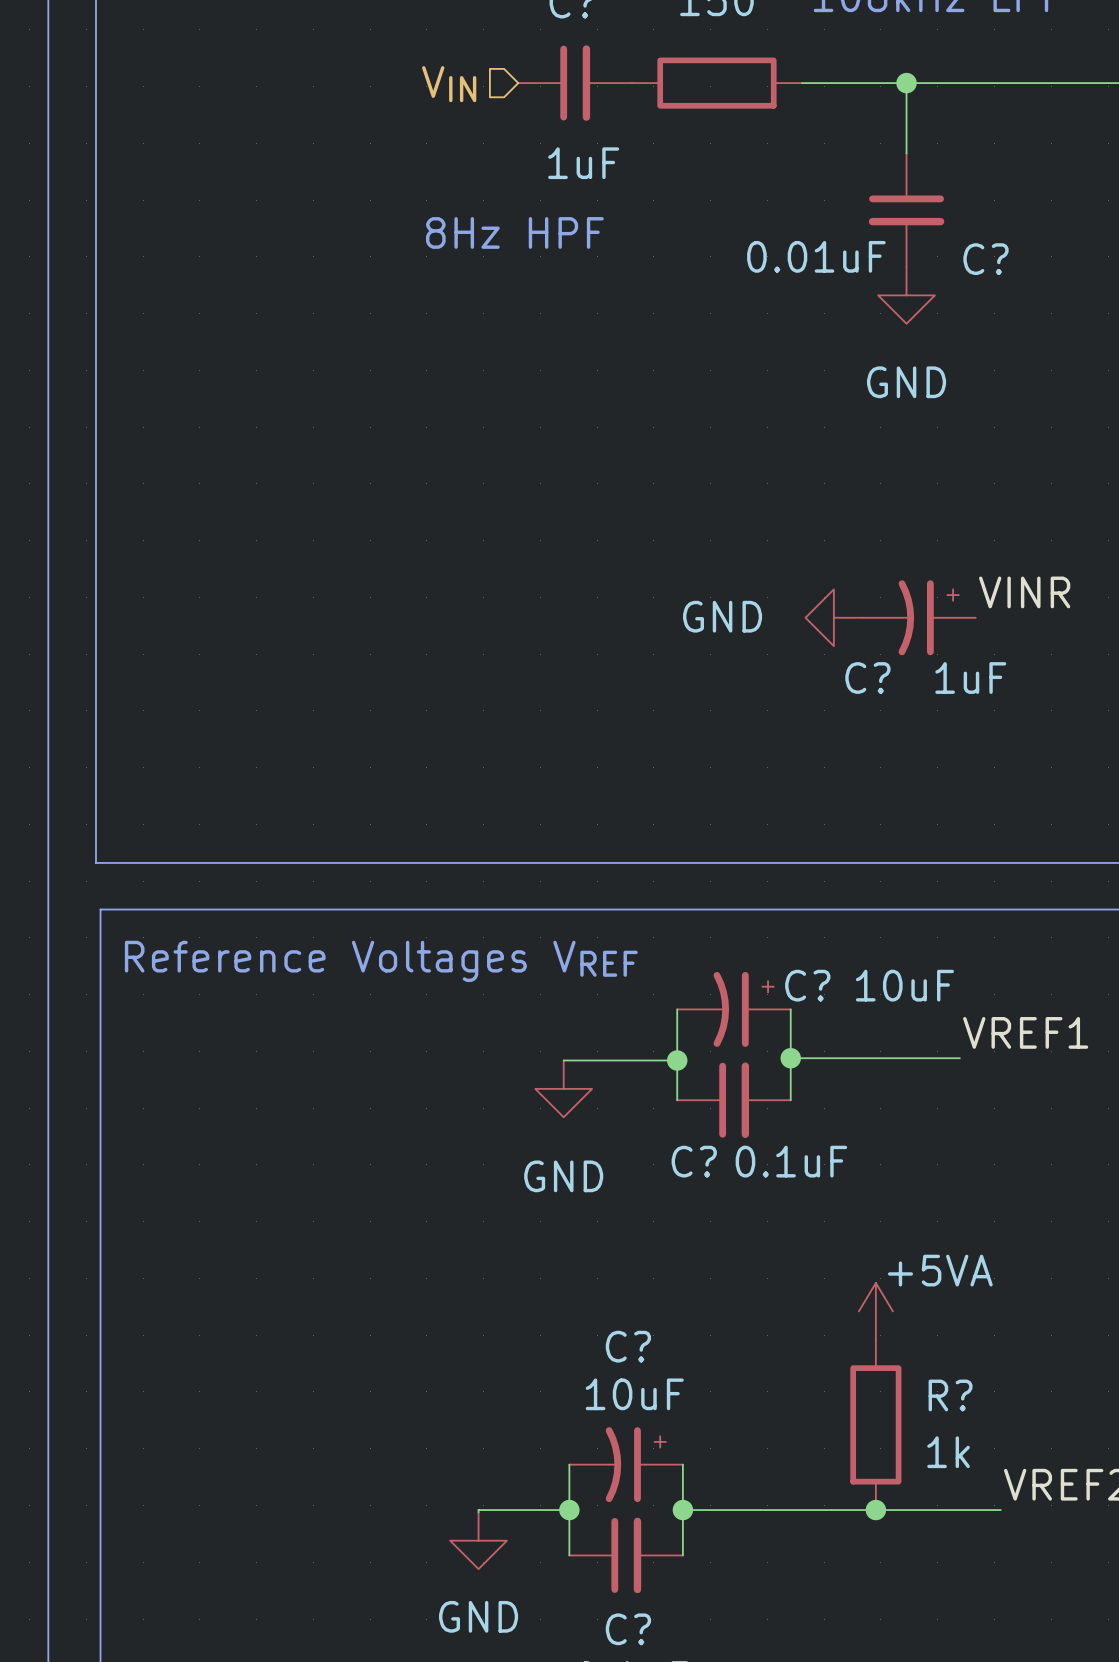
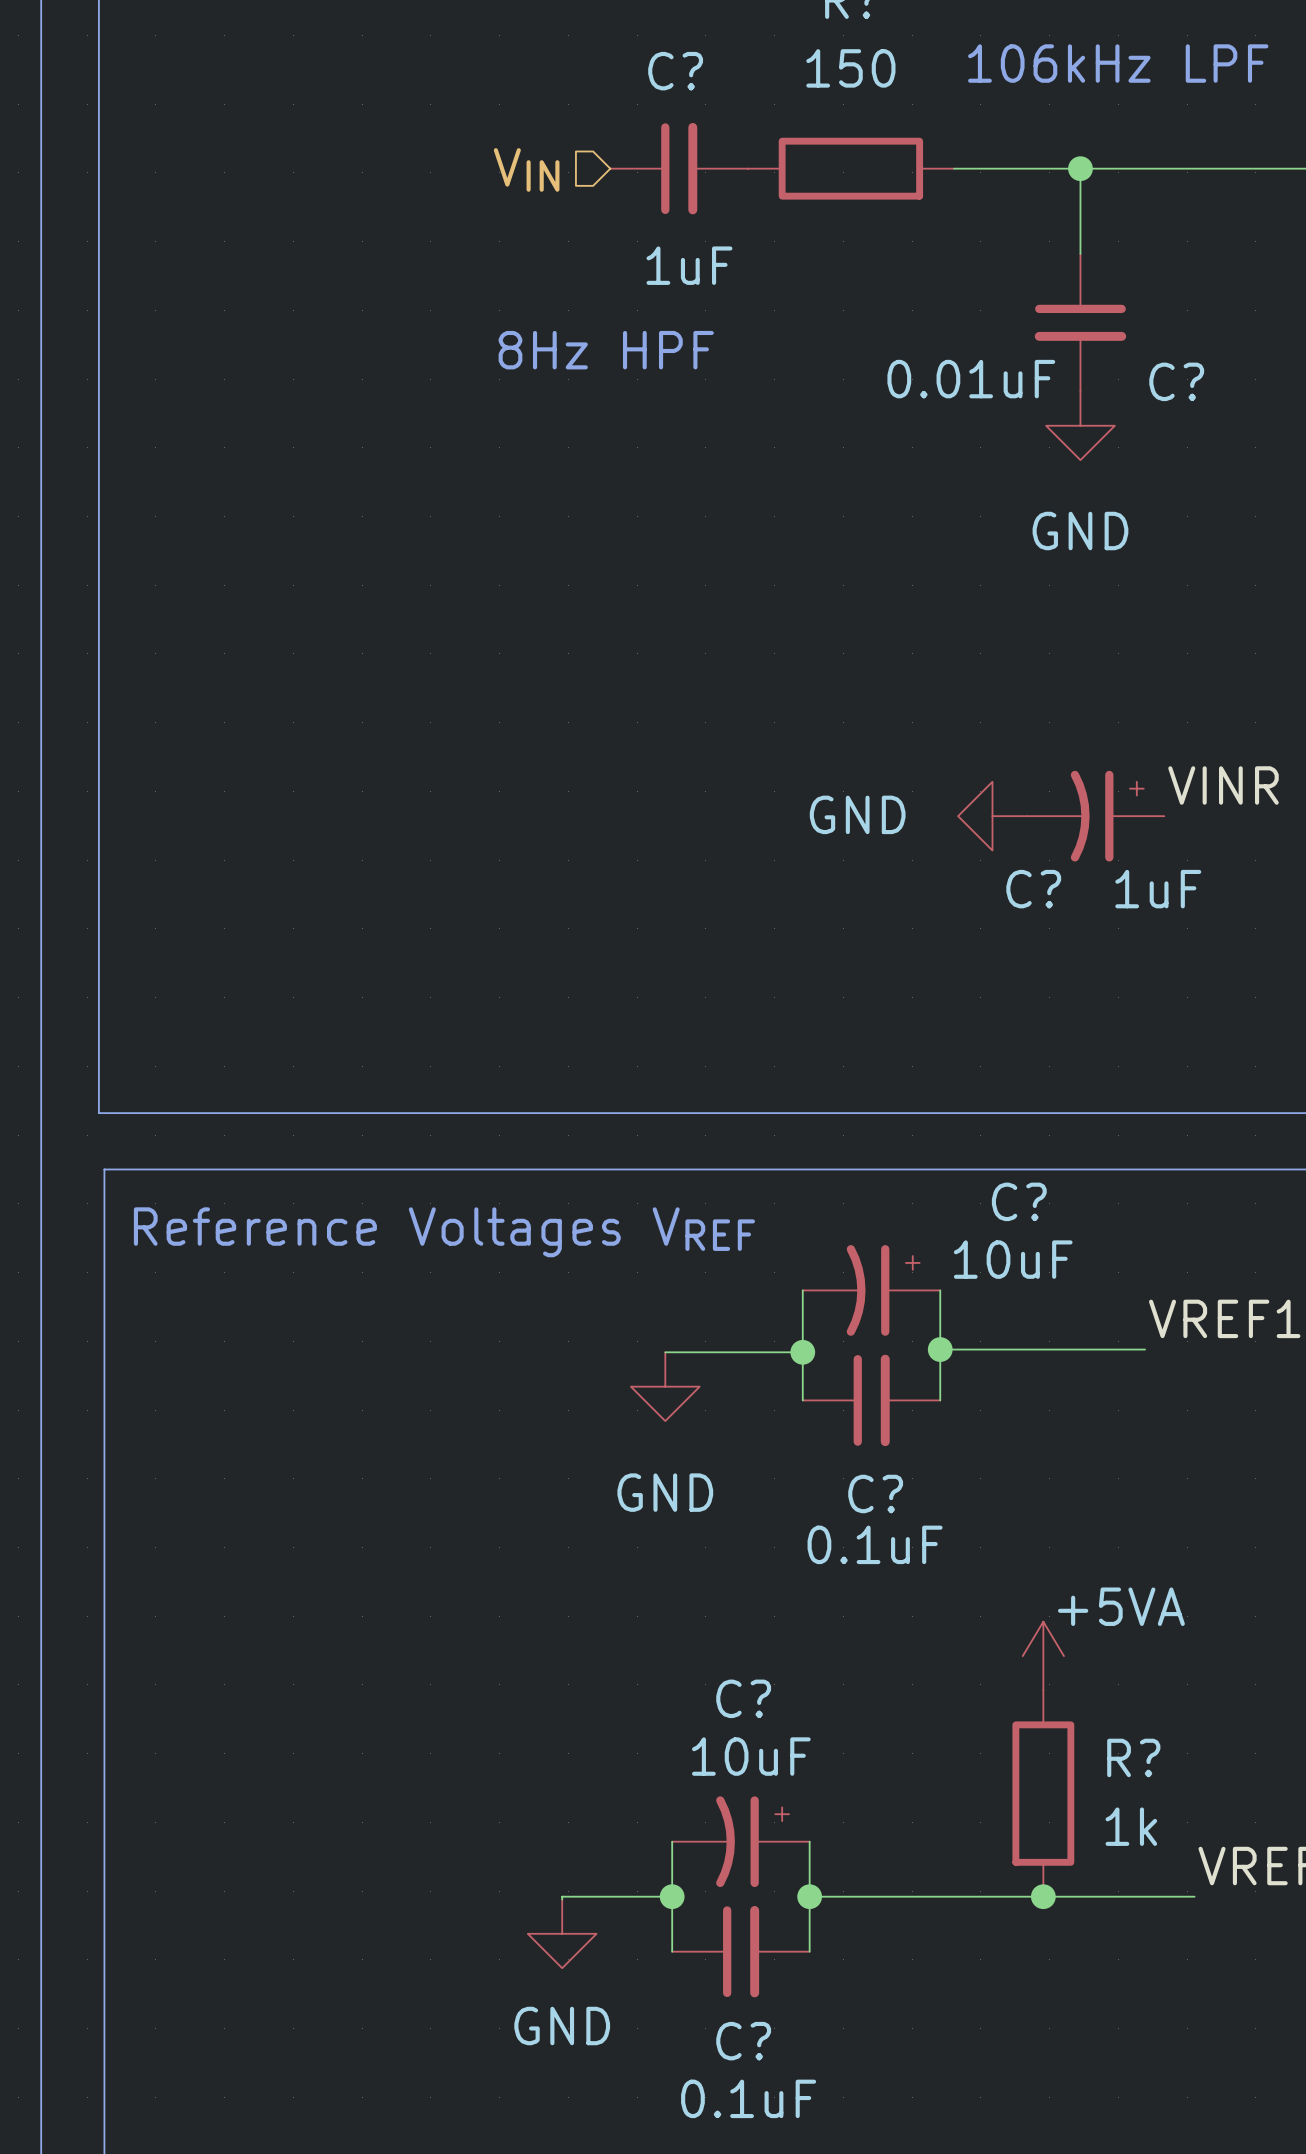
C? name position: C? (807, 985) -> C? (1019, 1201)
C? value position: 10uF (904, 985) -> 10uF (1013, 1259)
C? name position: C? (694, 1161) -> C? (875, 1493)
C? value position: 0.1uF (791, 1161) -> 0.1uF (875, 1544)

